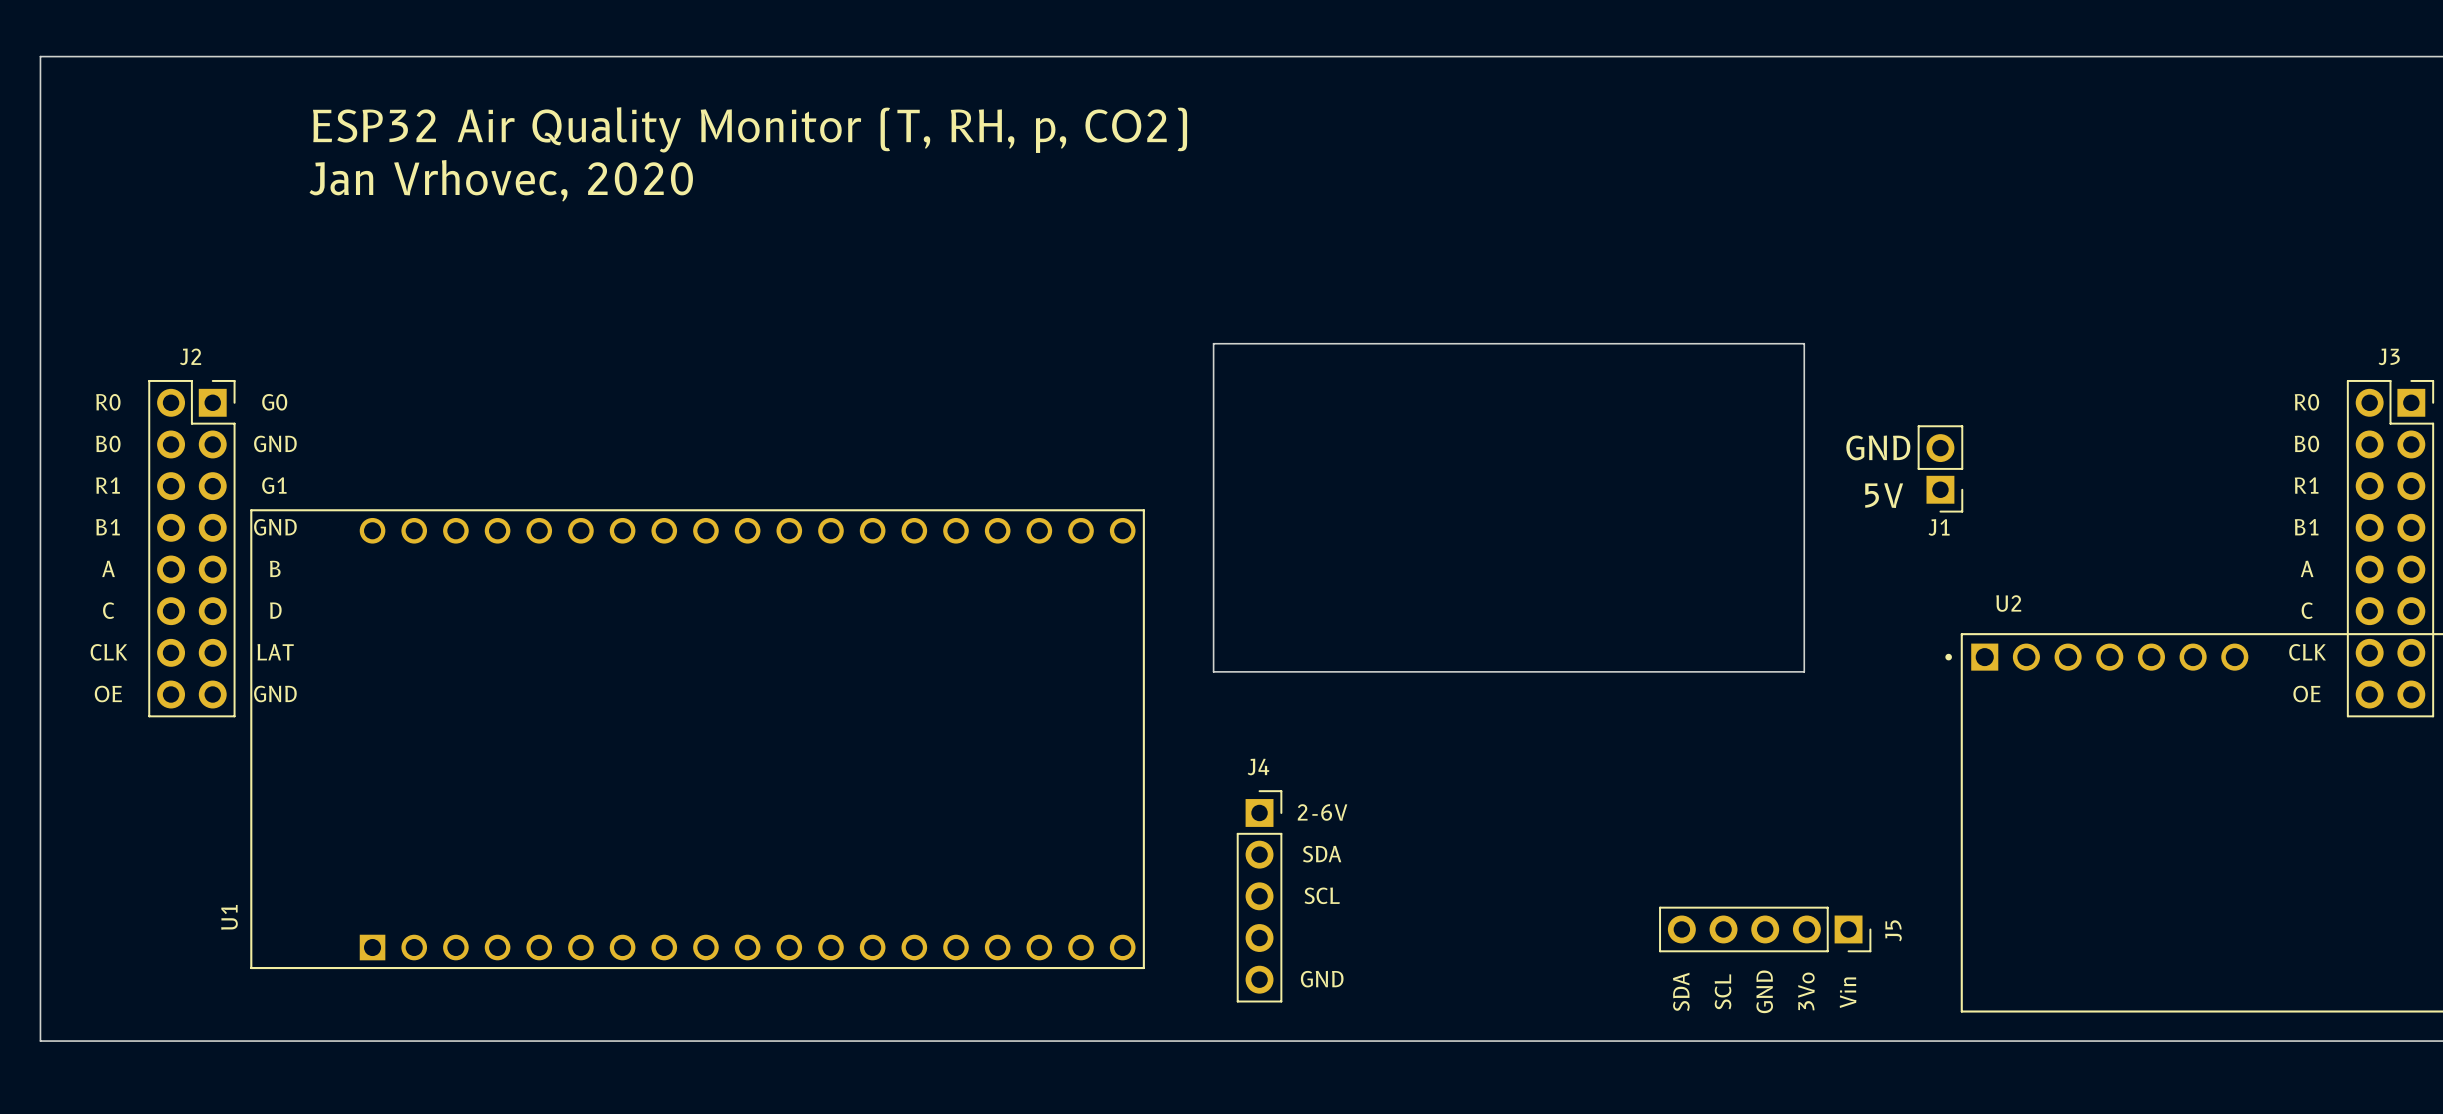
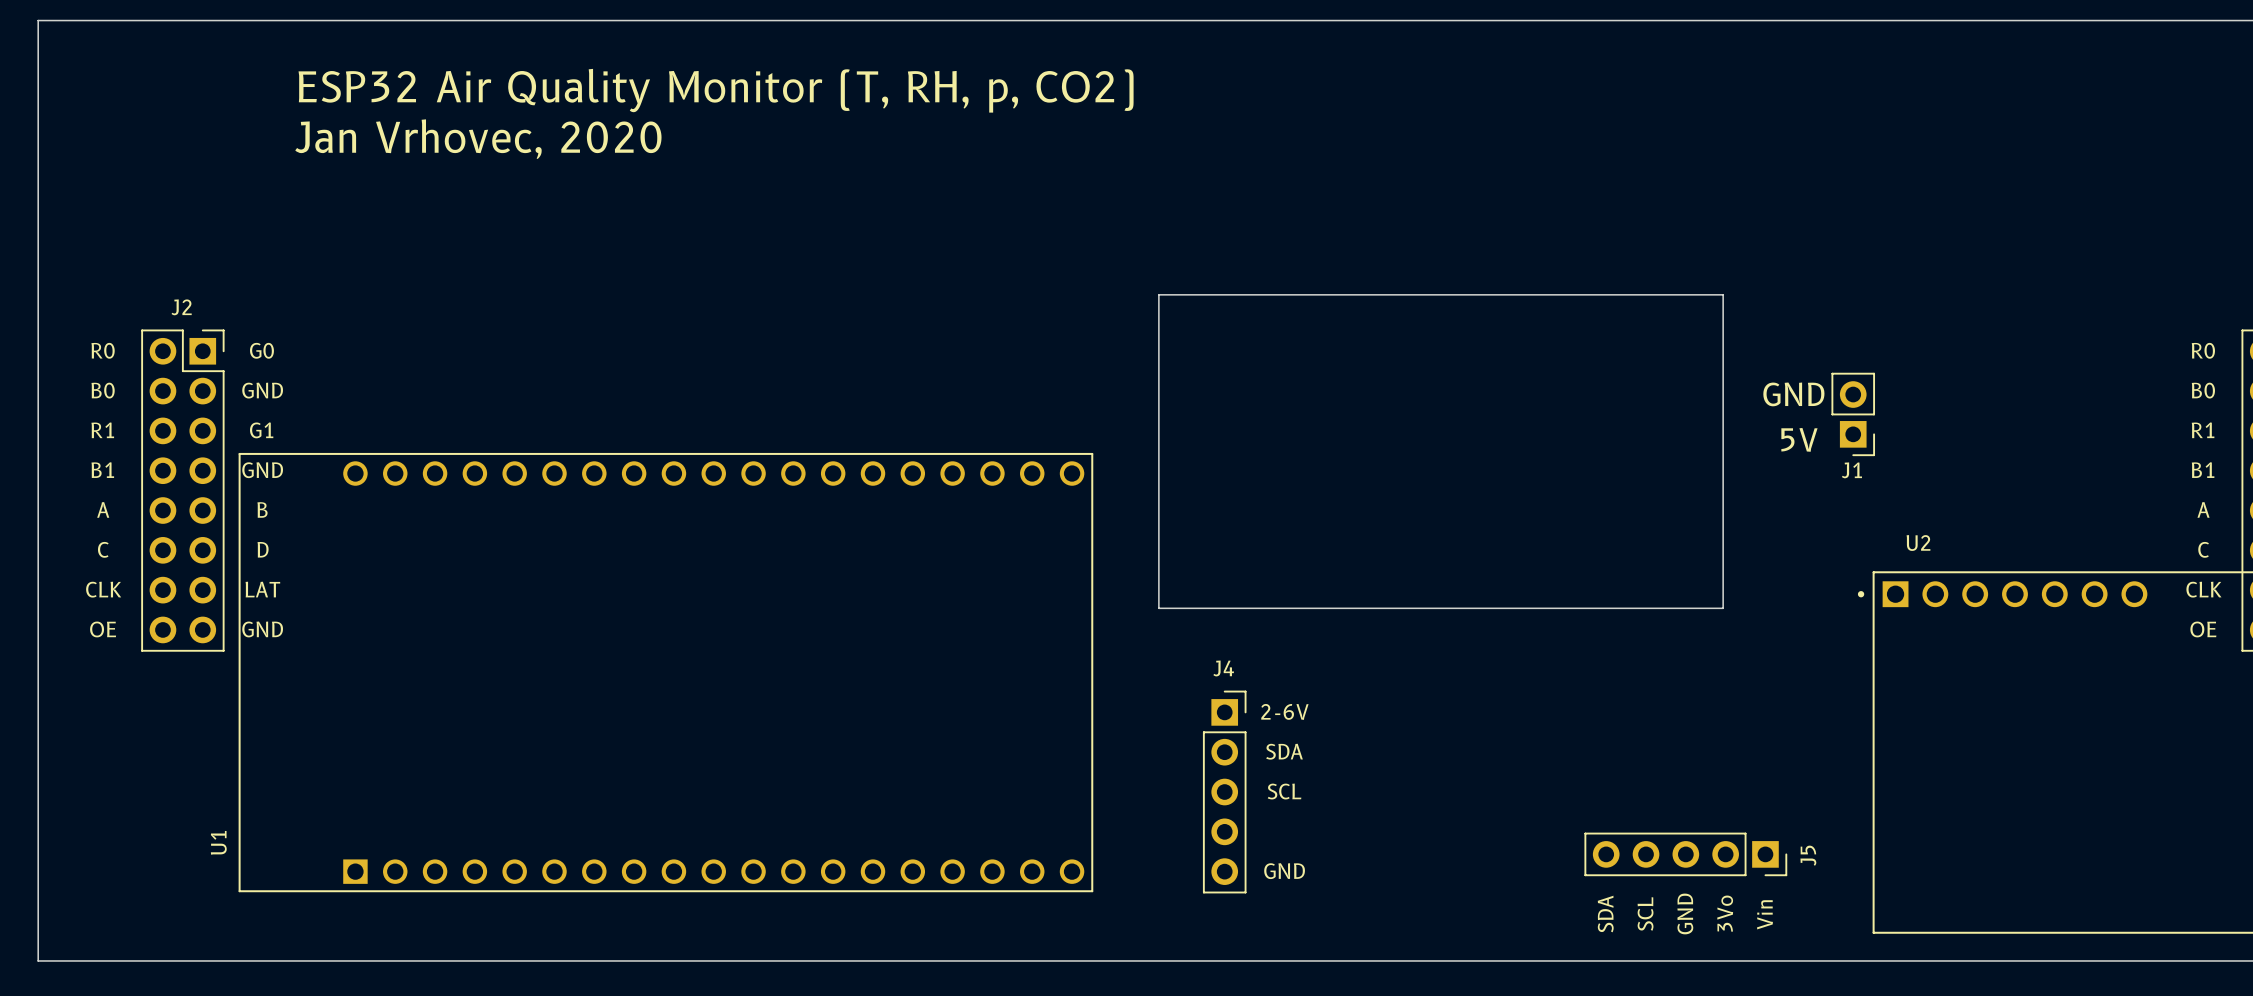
J4 position: (1259, 896) -> (1224, 792)

